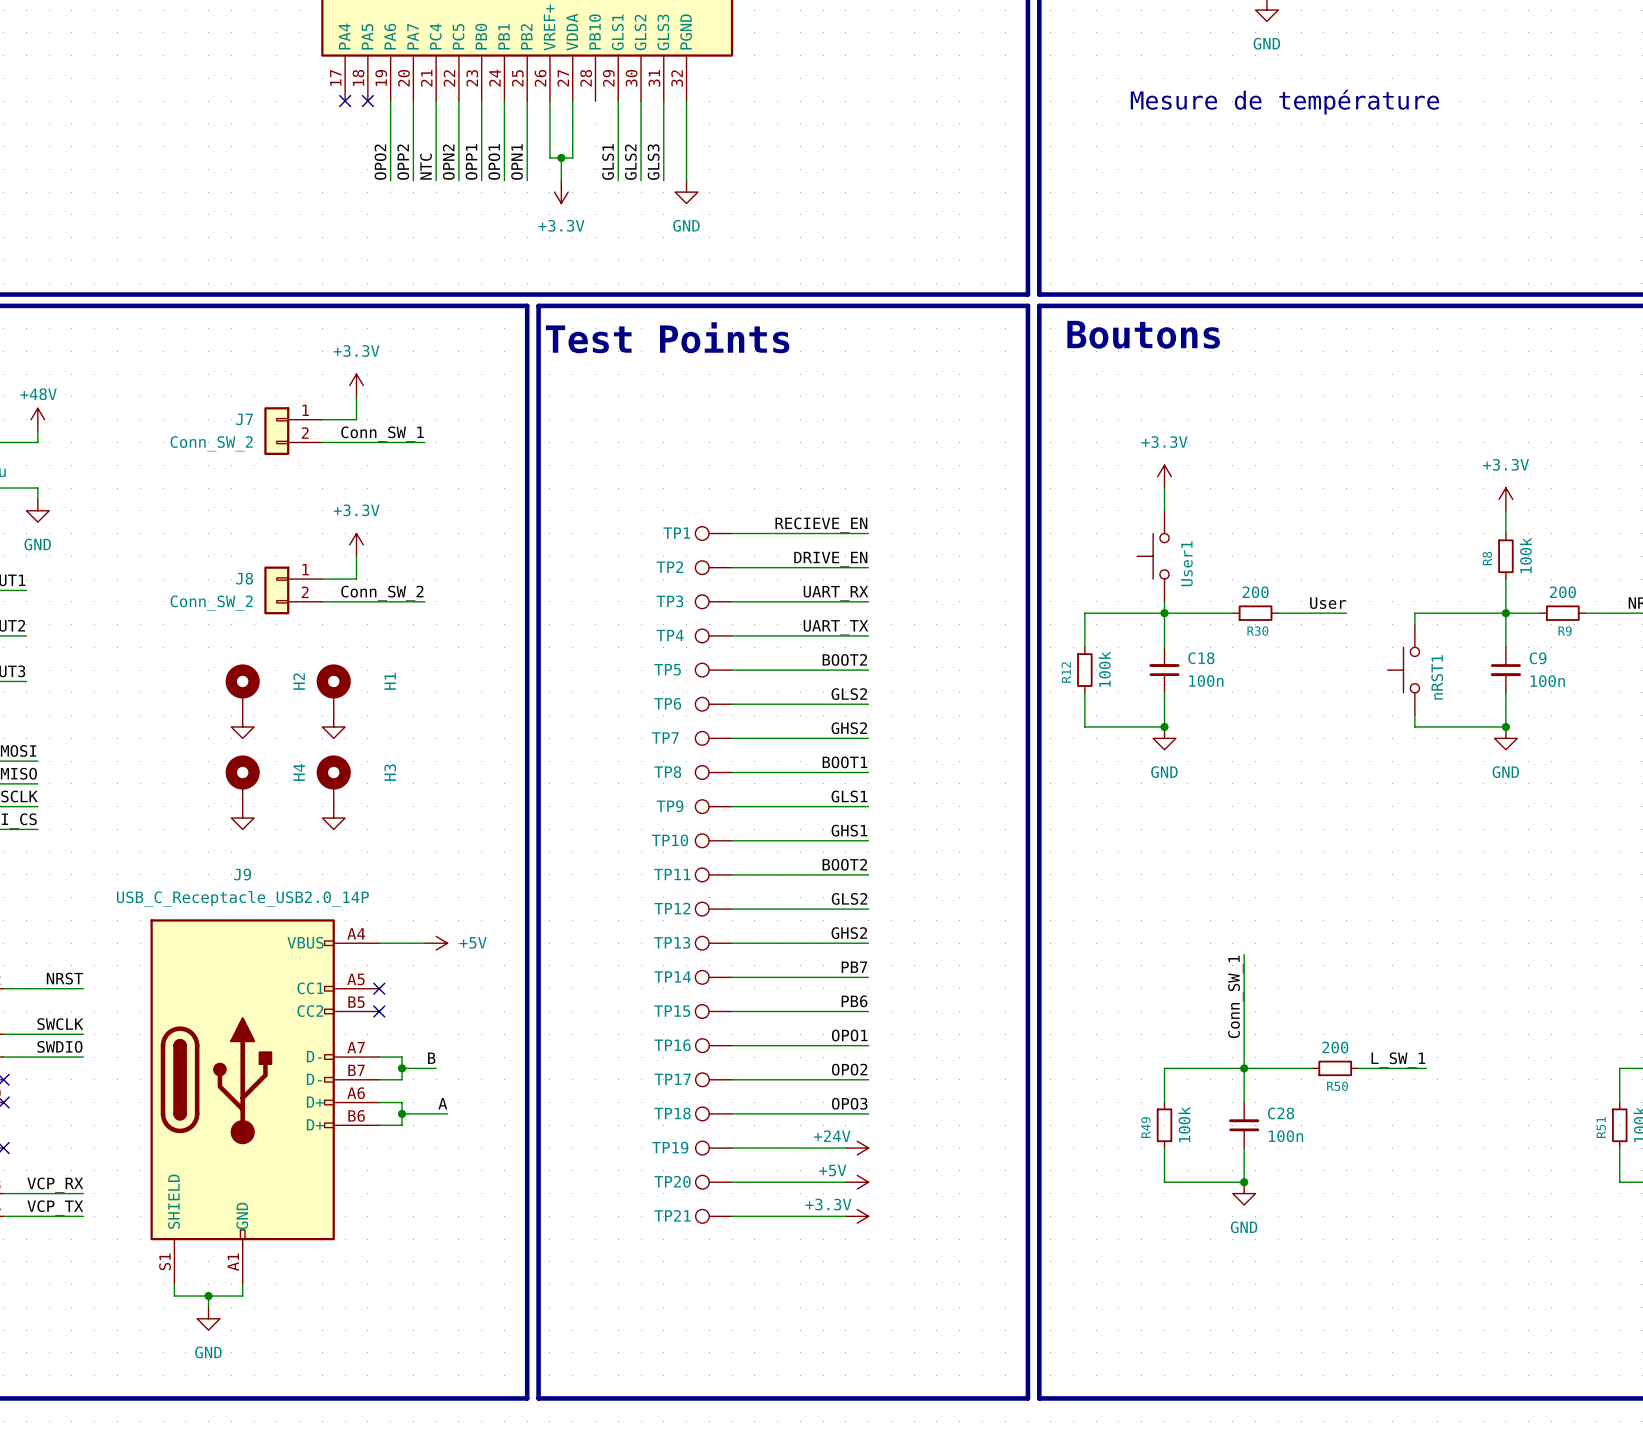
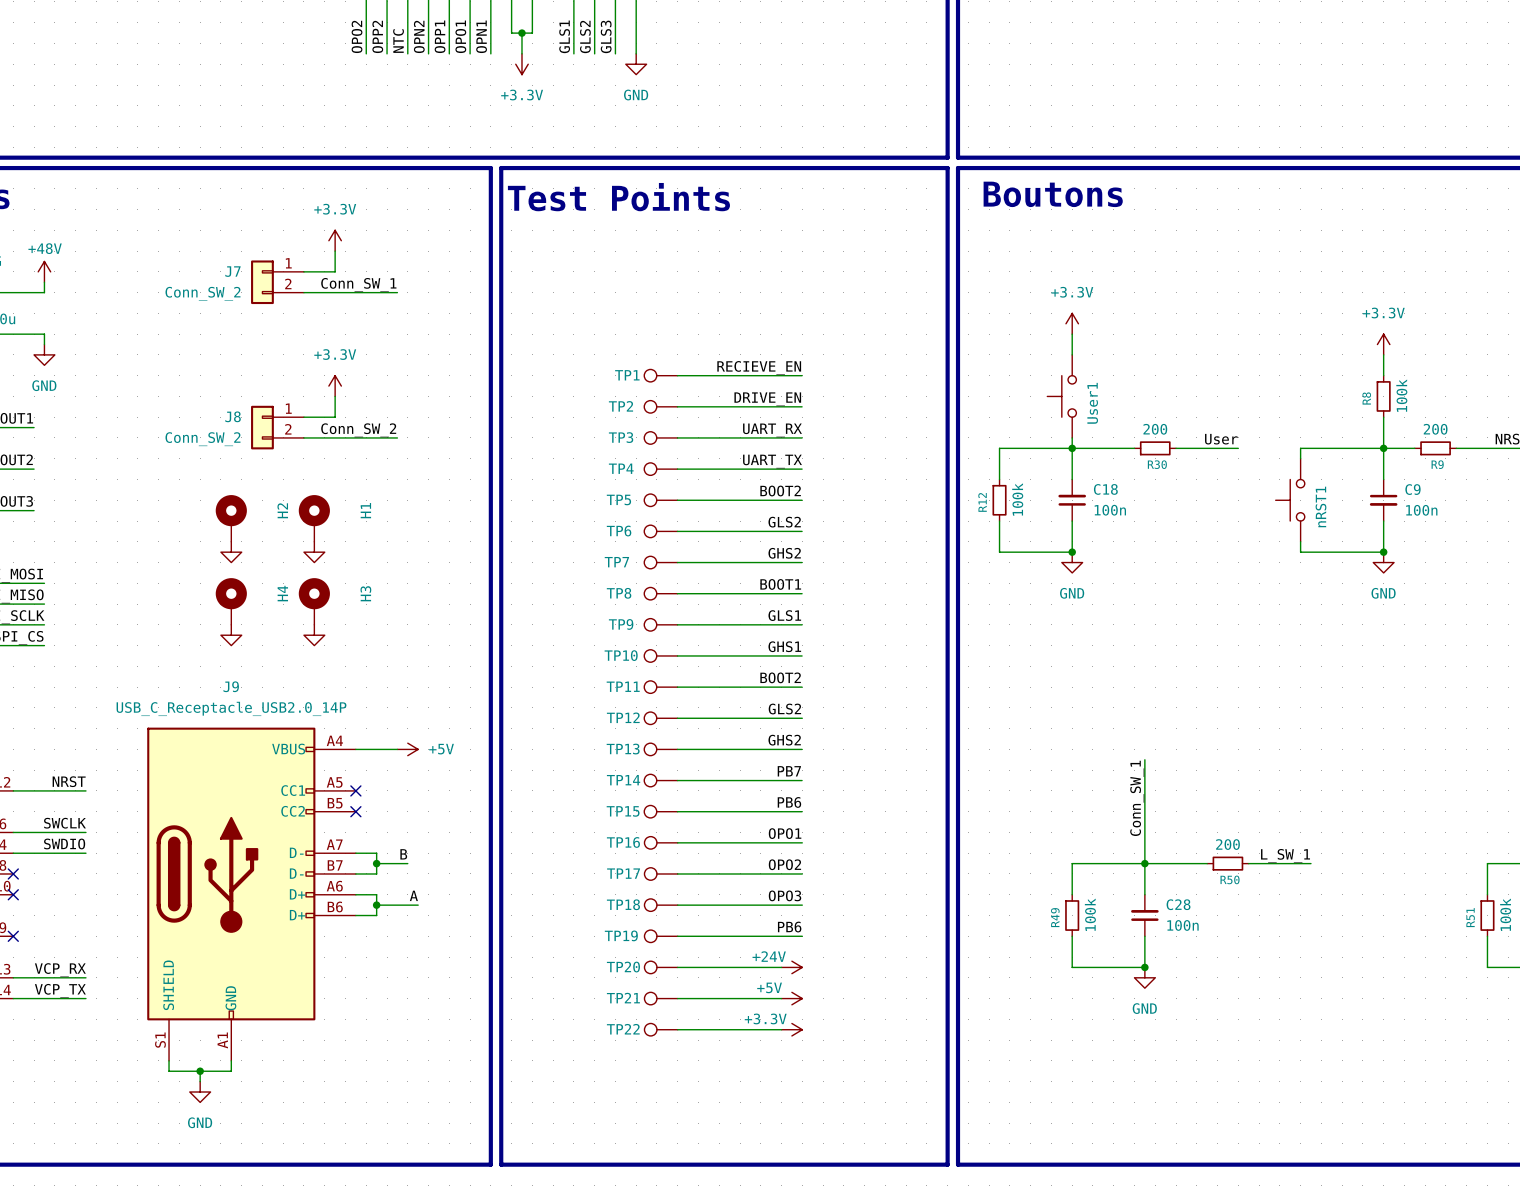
label: none -> PB6 (789, 927)
power symbol: +24V (857, 1148) -> none
power symbol: +5V (857, 1182) -> +24V (791, 967)
power symbol: +3.3V (857, 1216) -> +5V (791, 998)
TP22: none -> (661, 1029)
wire: none -> (677, 1029) (781, 1029)
power symbol: none -> +3.3V (791, 1029)

